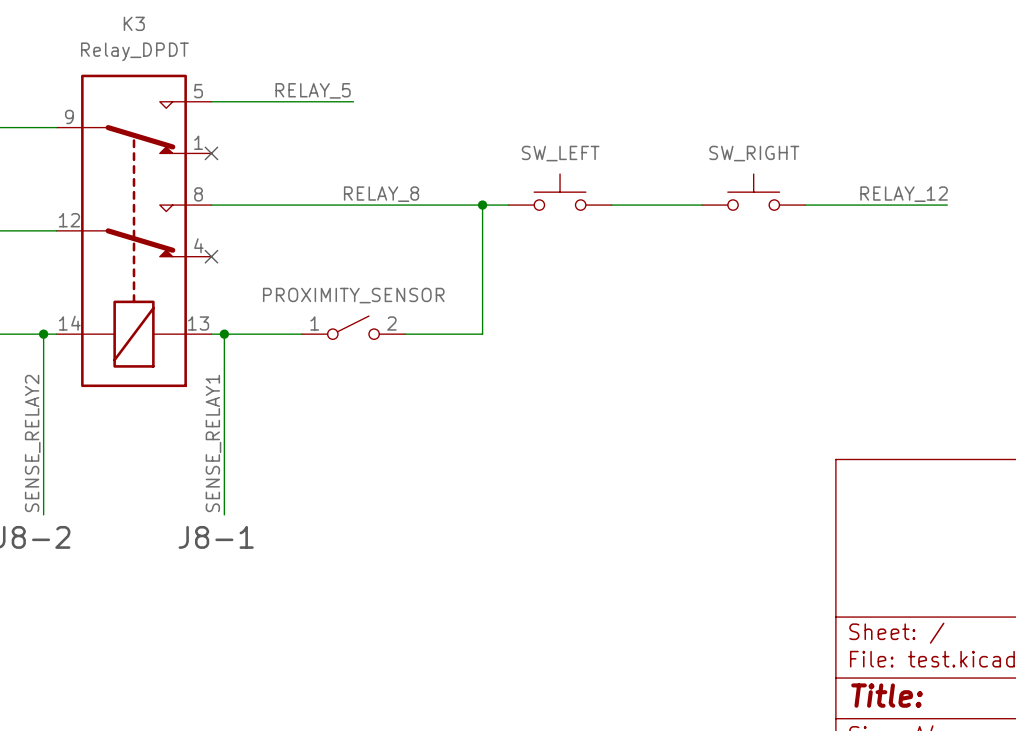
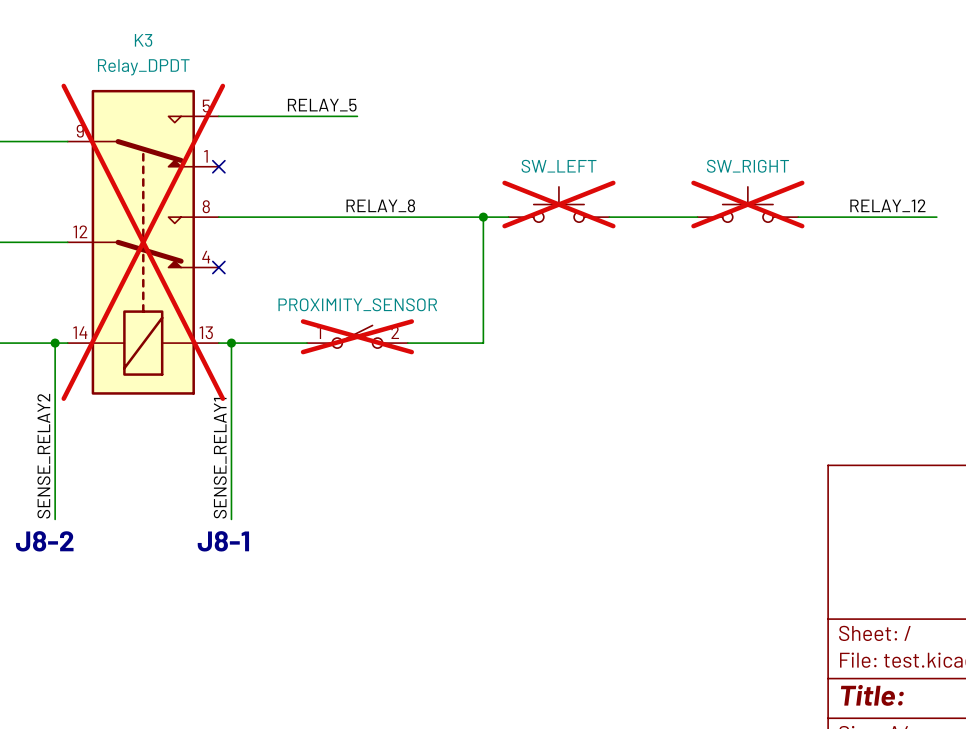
part do-not-place cross: none -> (558, 204)
part do-not-place cross: none -> (747, 204)
K3 do-not-place cross: none -> (143, 242)
part do-not-place cross: none -> (357, 336)

